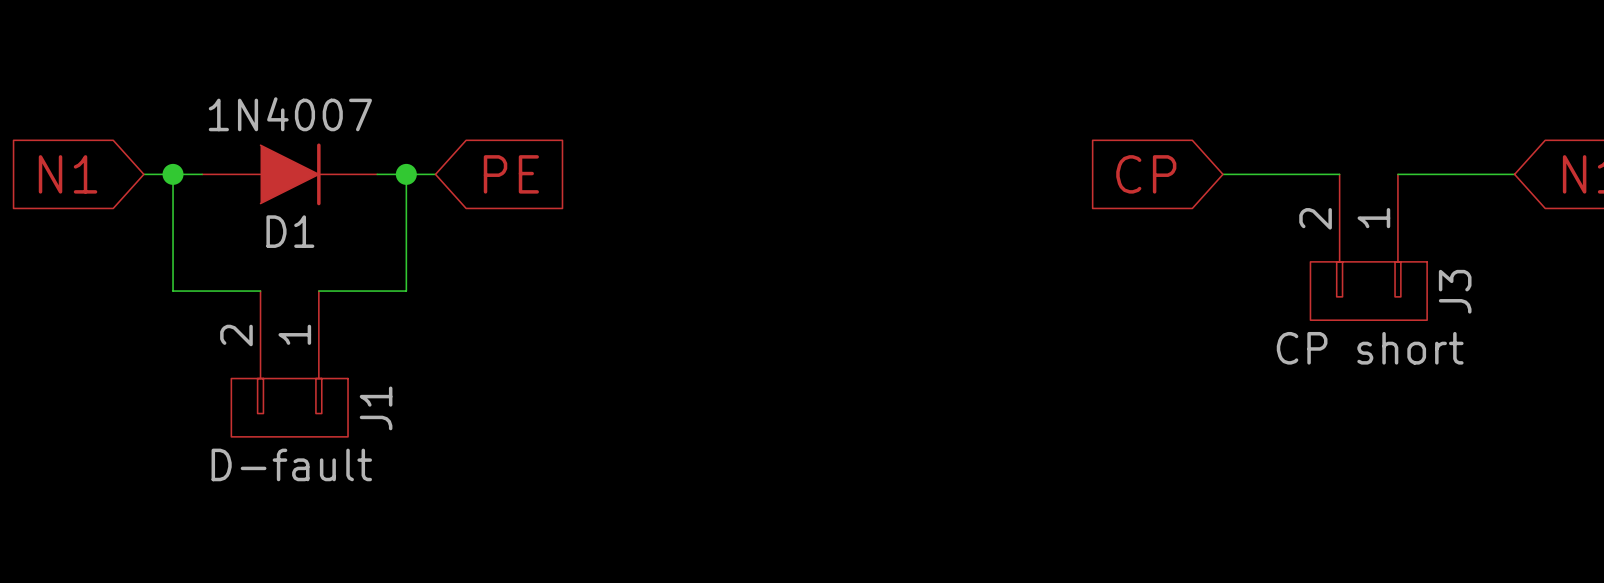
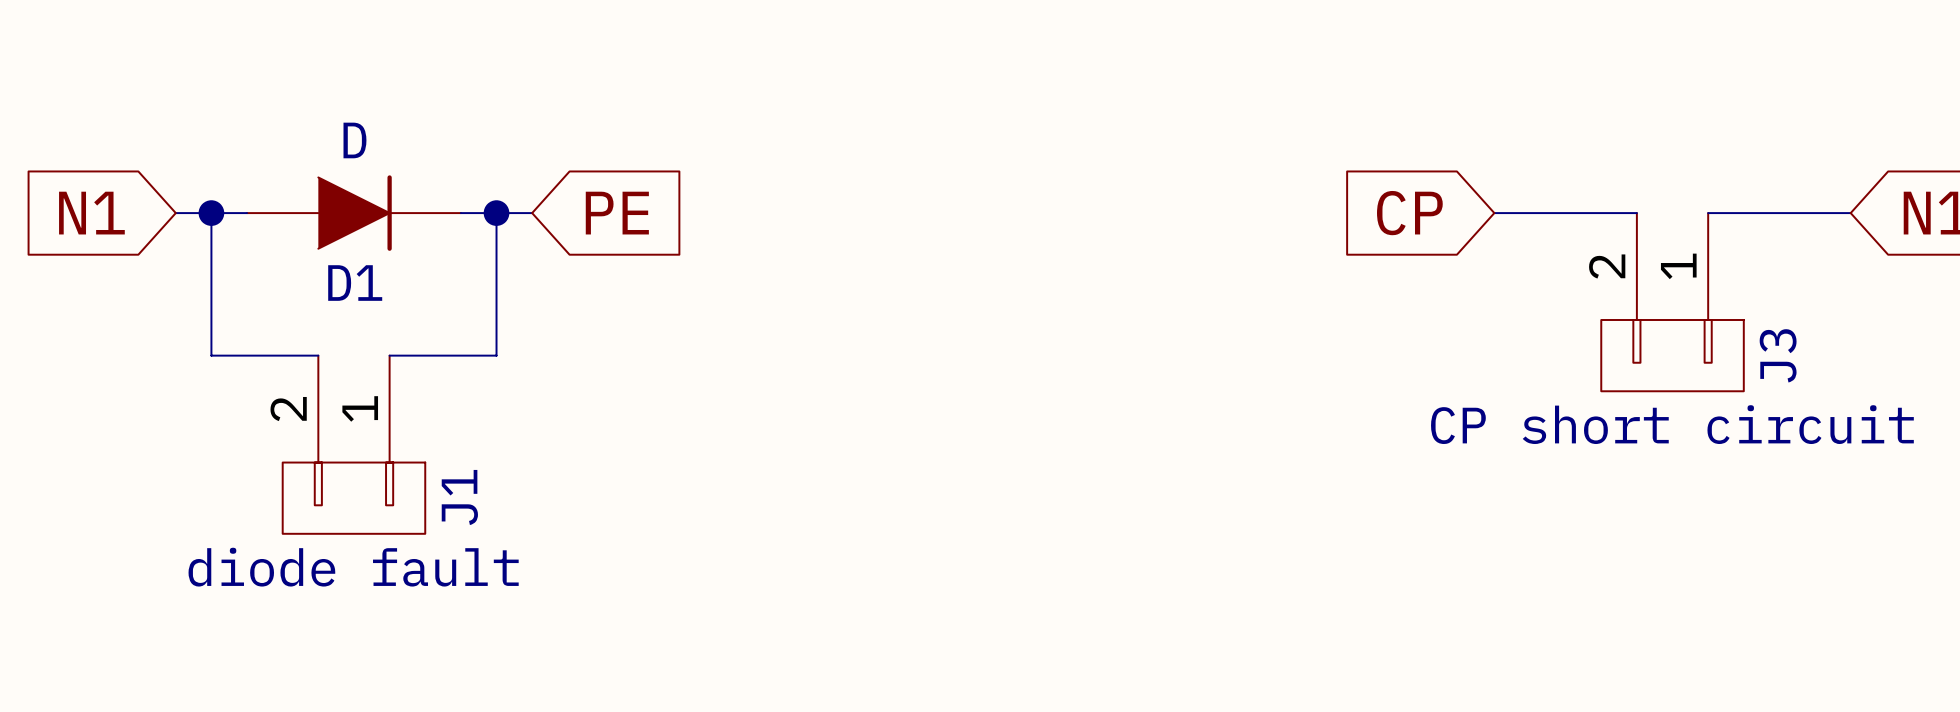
D1 value: 1N4007 (290, 114) -> D (354, 140)
J3 value: CP short (1370, 348) -> CP short circuit (1672, 424)
J1 value: D-fault (291, 464) -> diode fault (353, 567)

